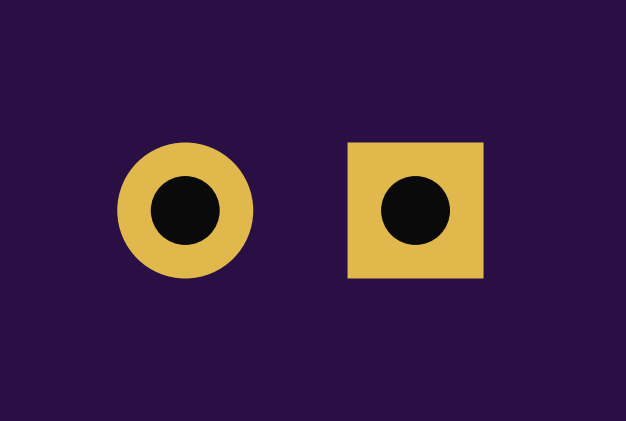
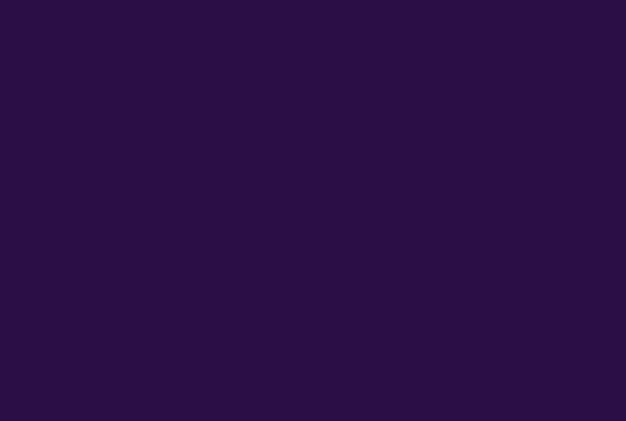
part: (300, 210) -> none

